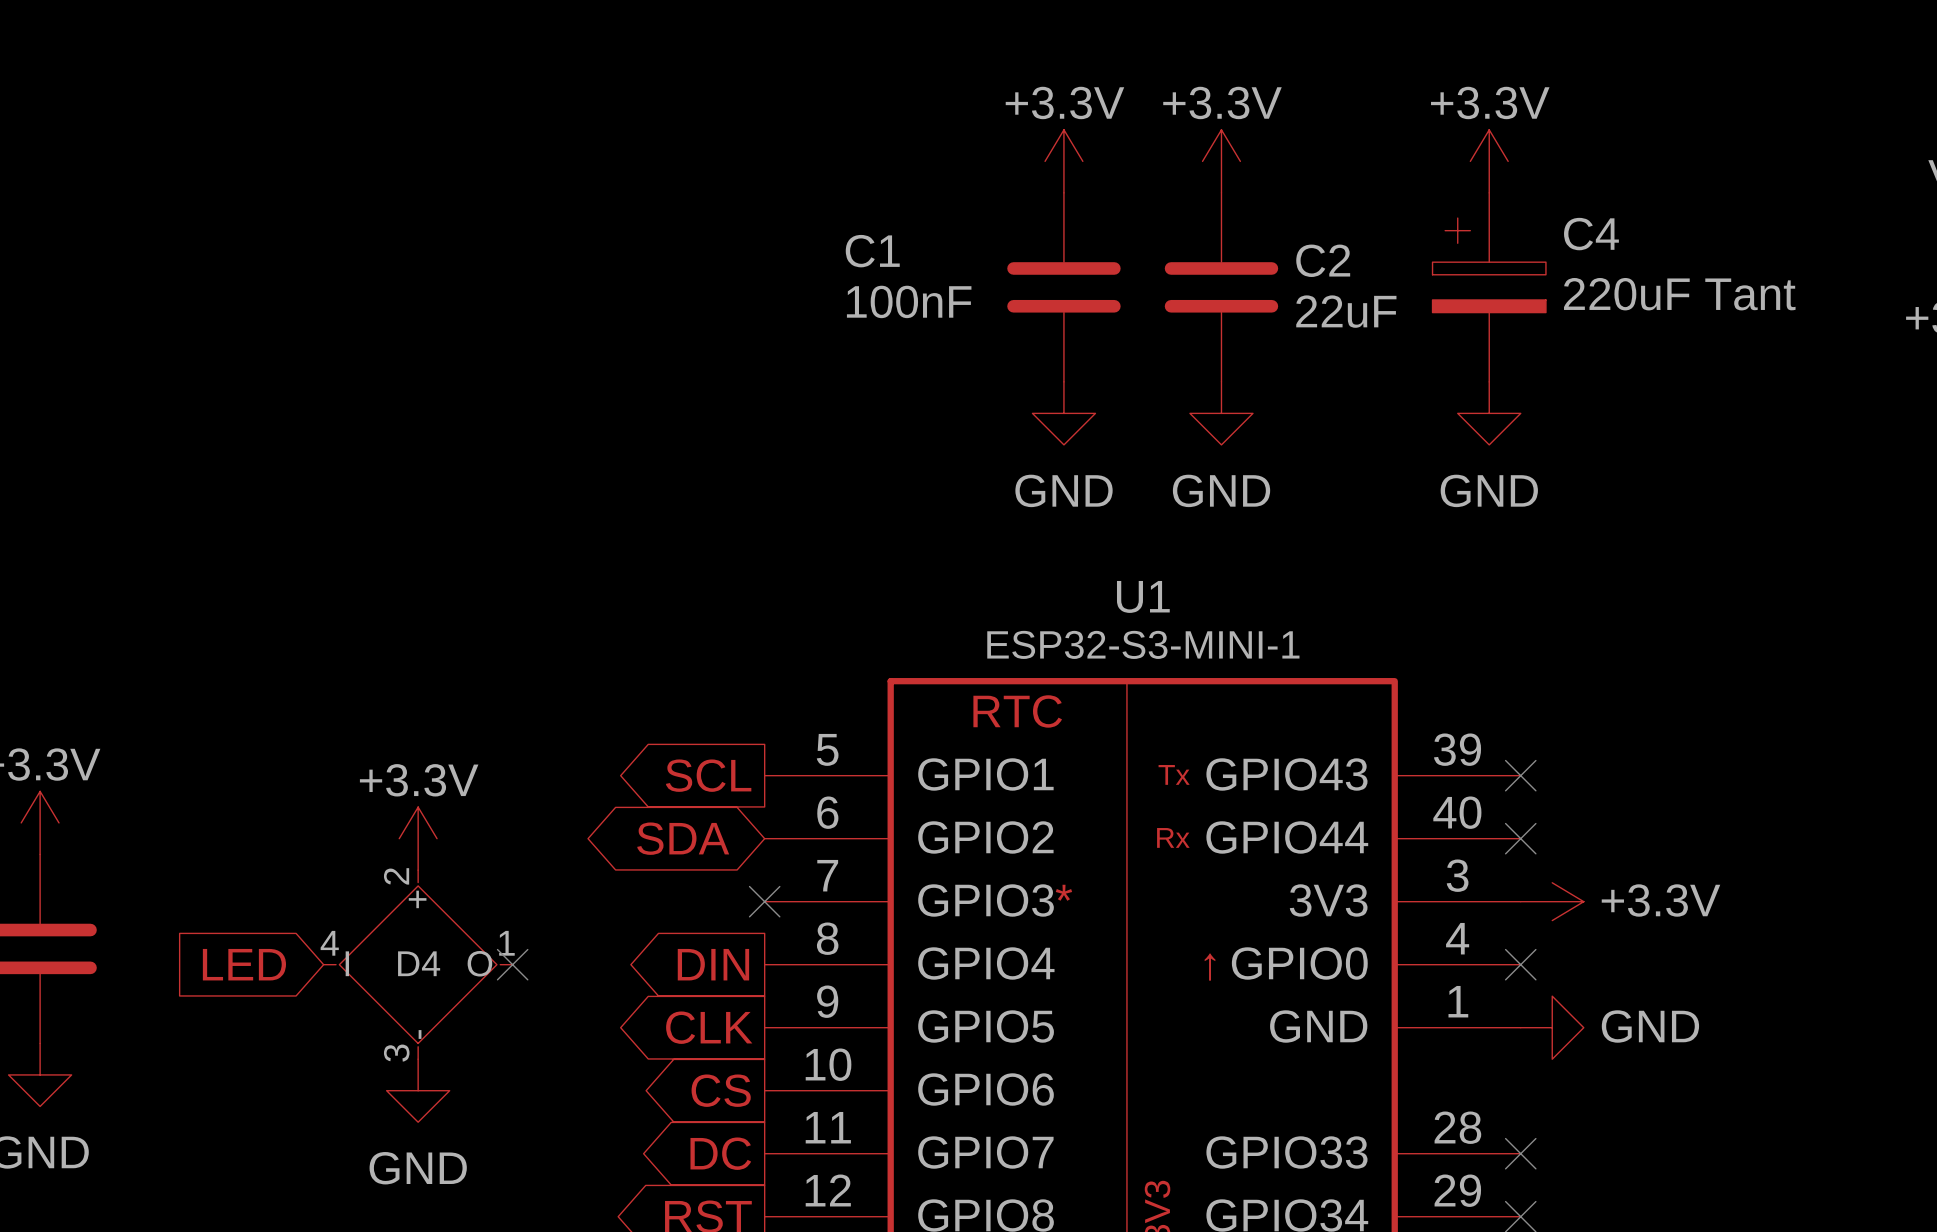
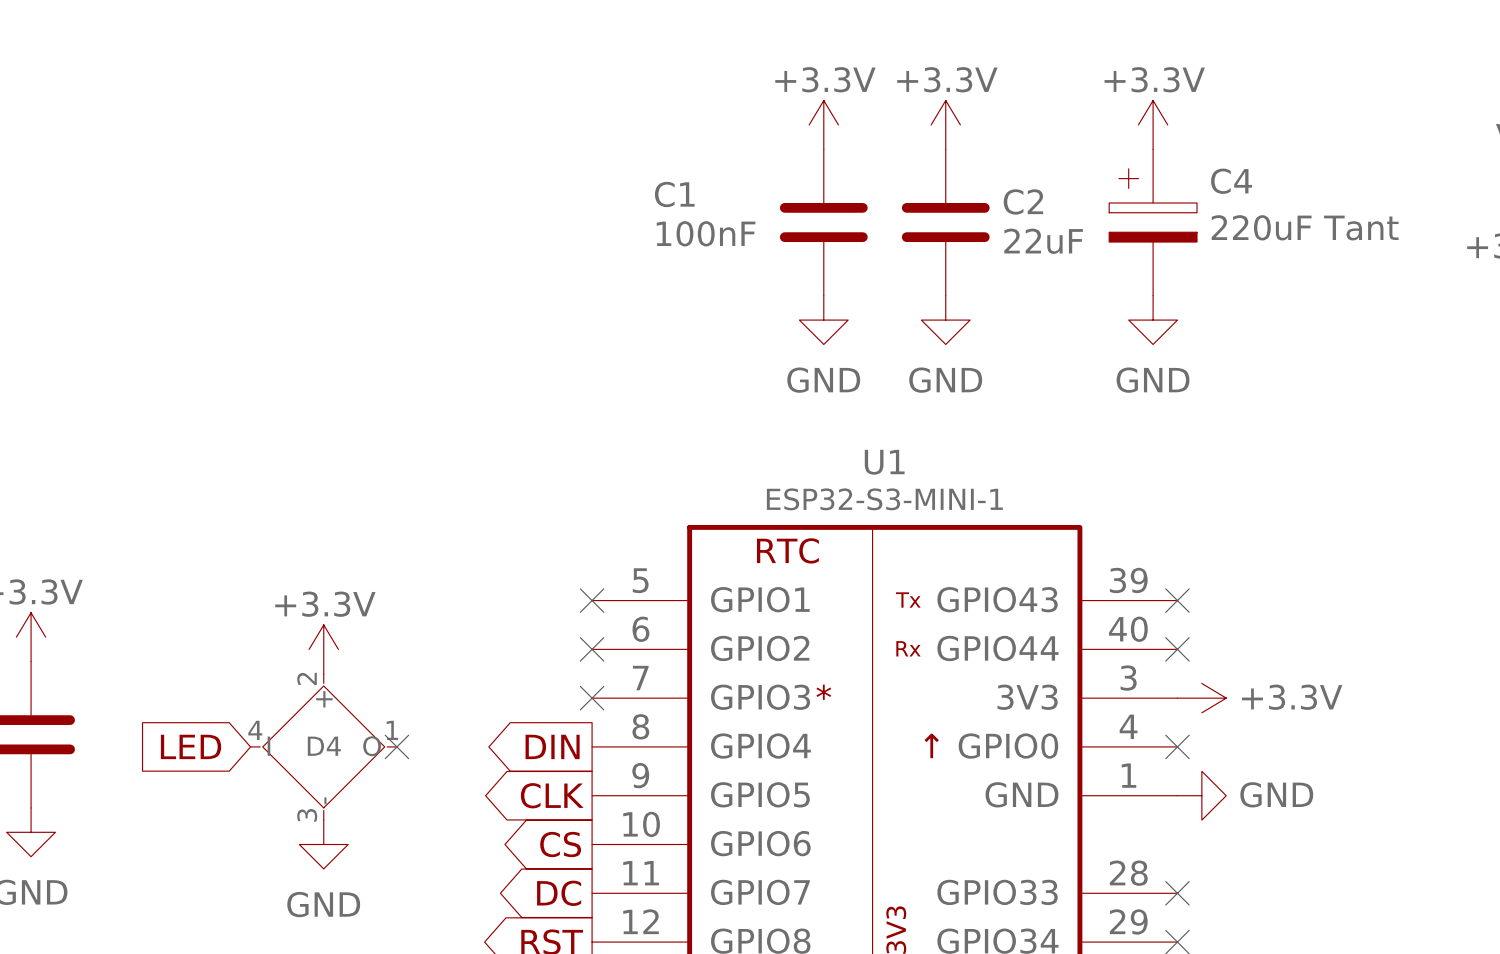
global label: SCL (708, 775) -> none
no-connect mark: none -> (592, 600)
global label: SDA (683, 838) -> none
no-connect mark: none -> (592, 649)

